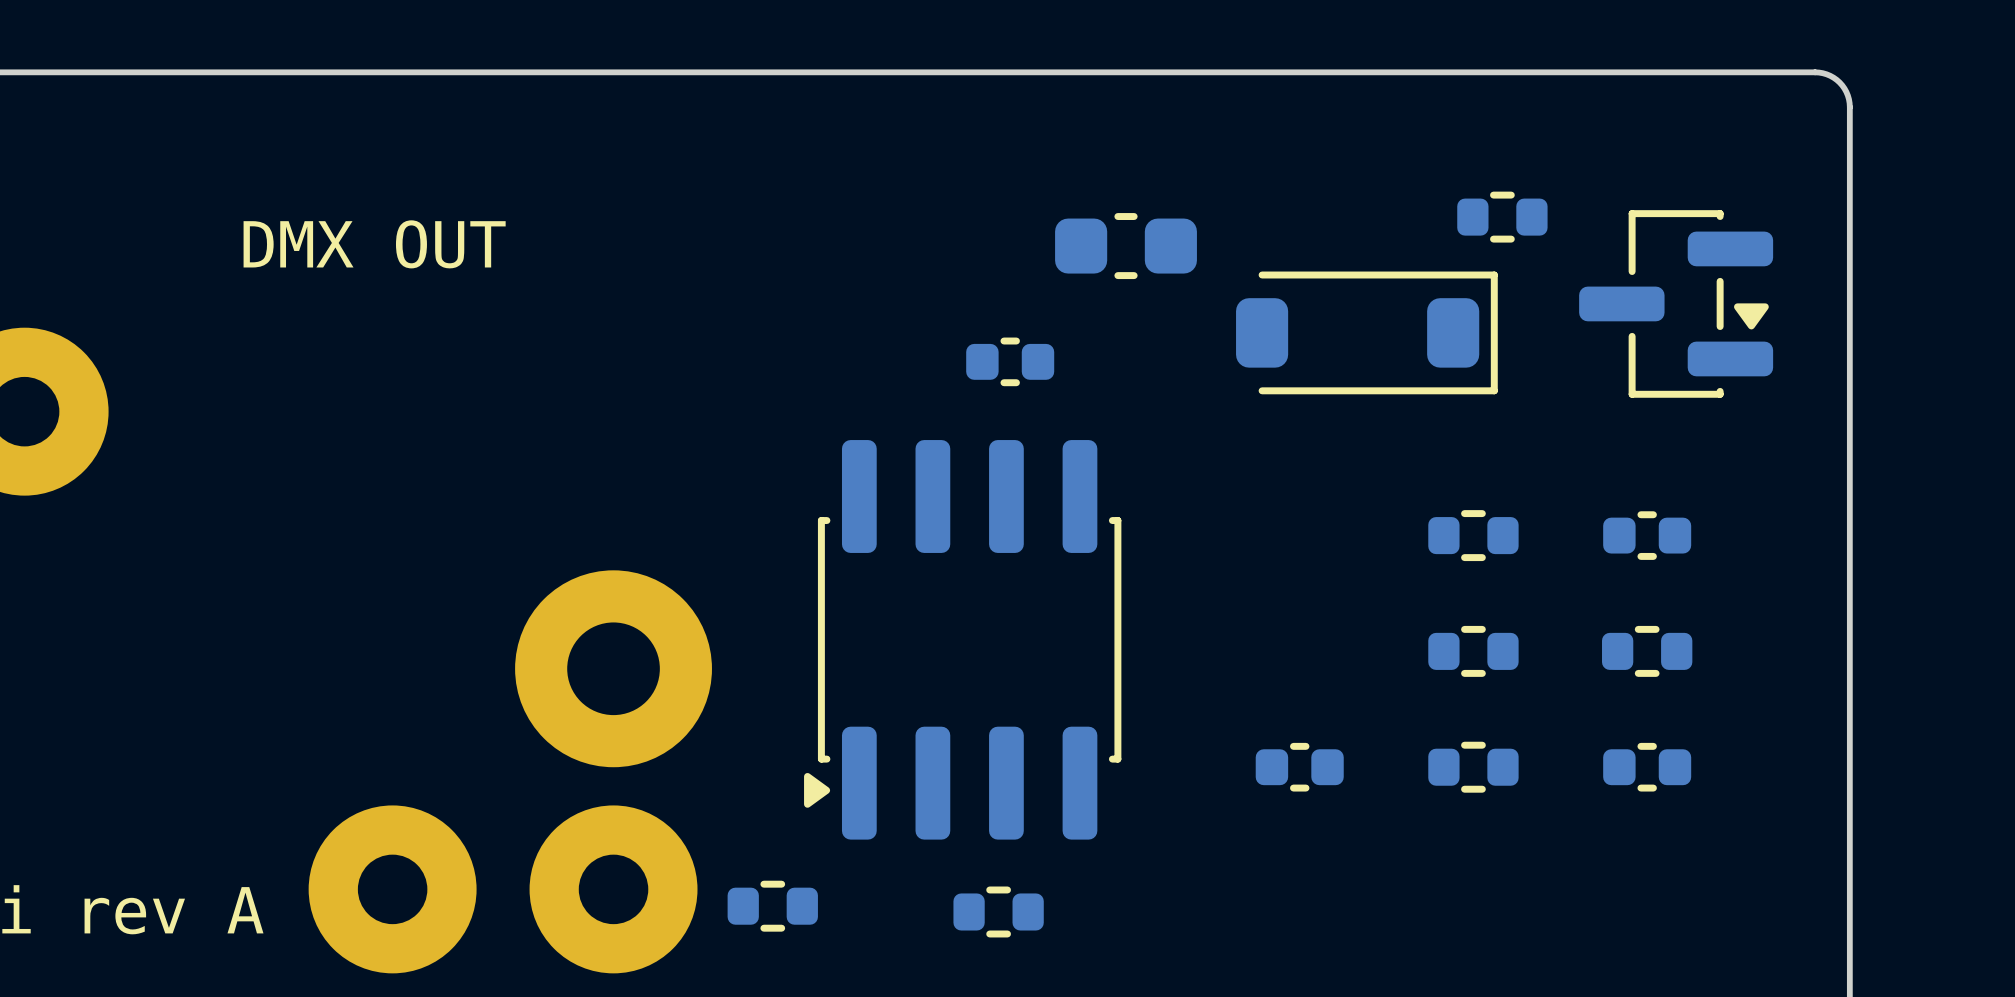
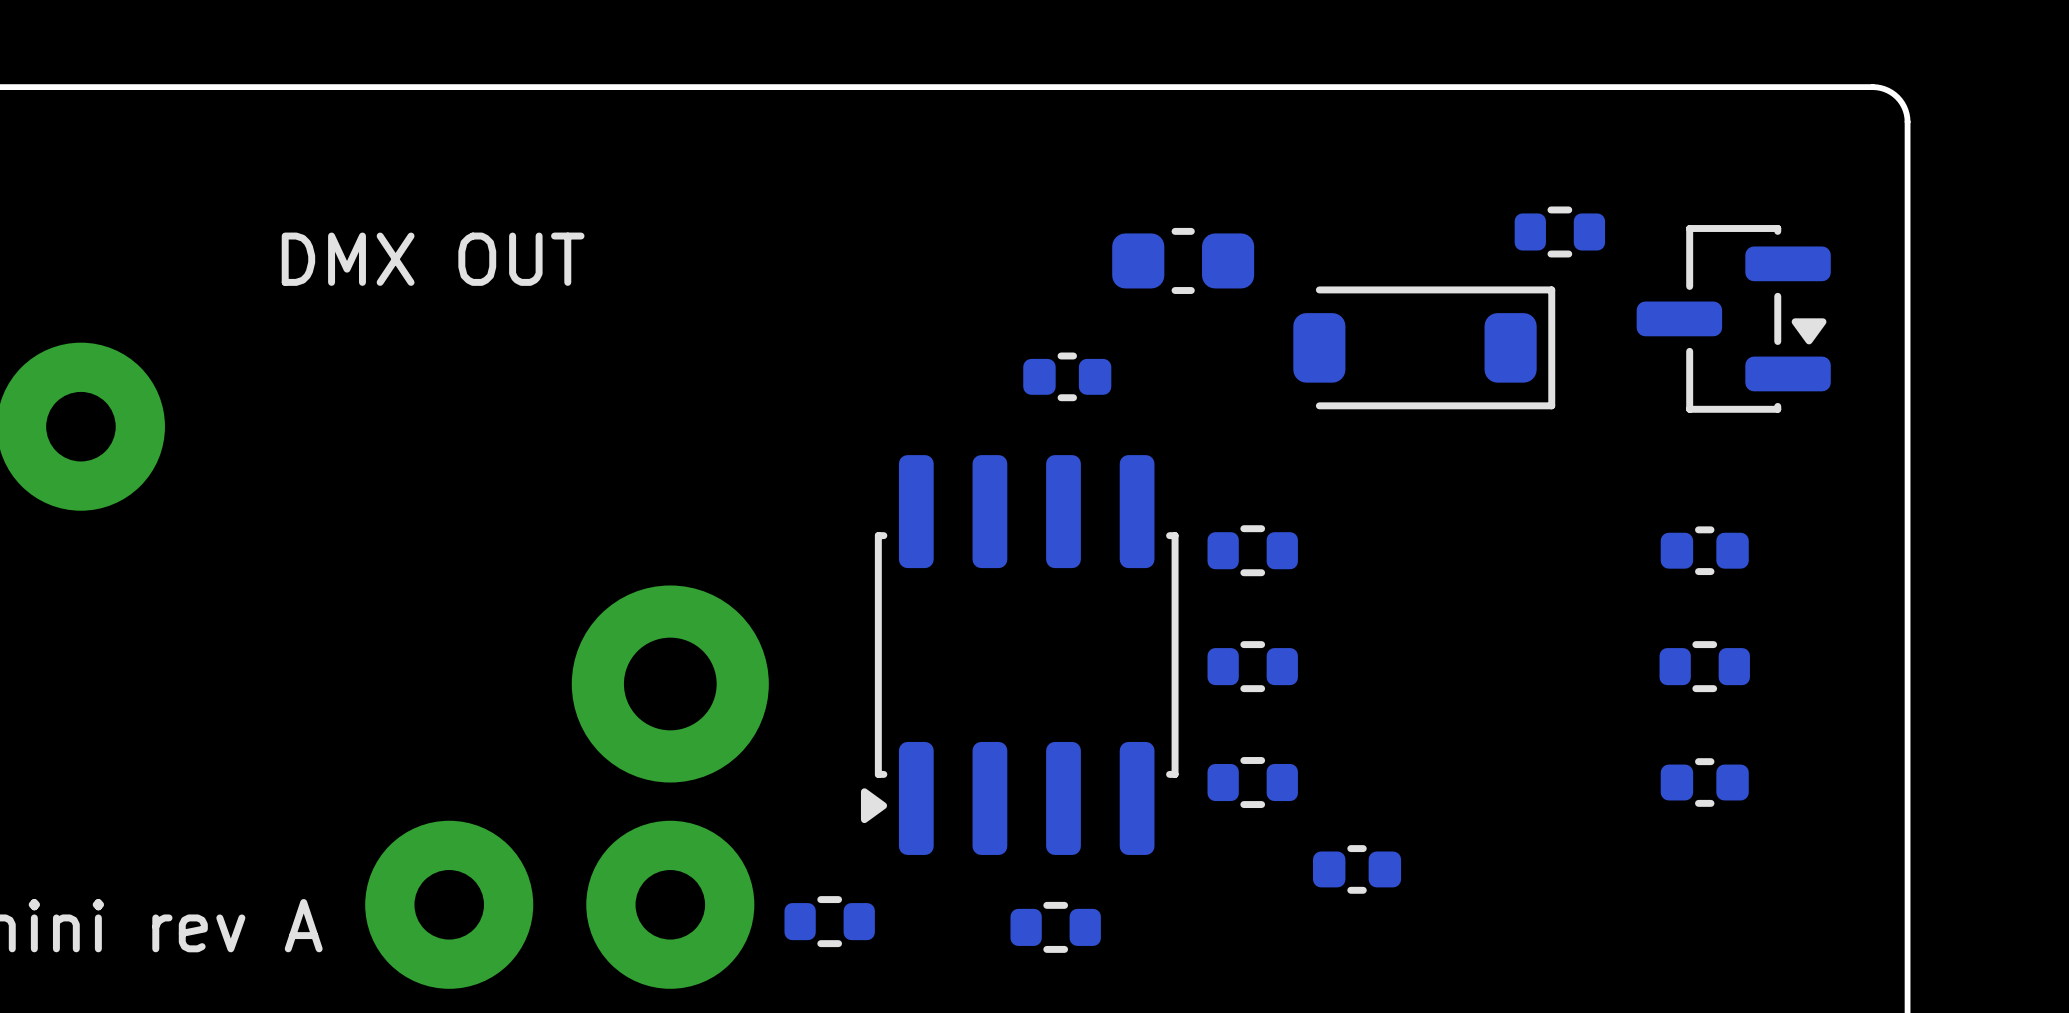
part: none -> (1252, 550)
part: (1473, 535) -> none
part: none -> (1252, 666)
part: (1473, 651) -> none
part: none -> (1252, 782)
part position: (1299, 767) -> (1357, 869)
part: (1473, 767) -> none

